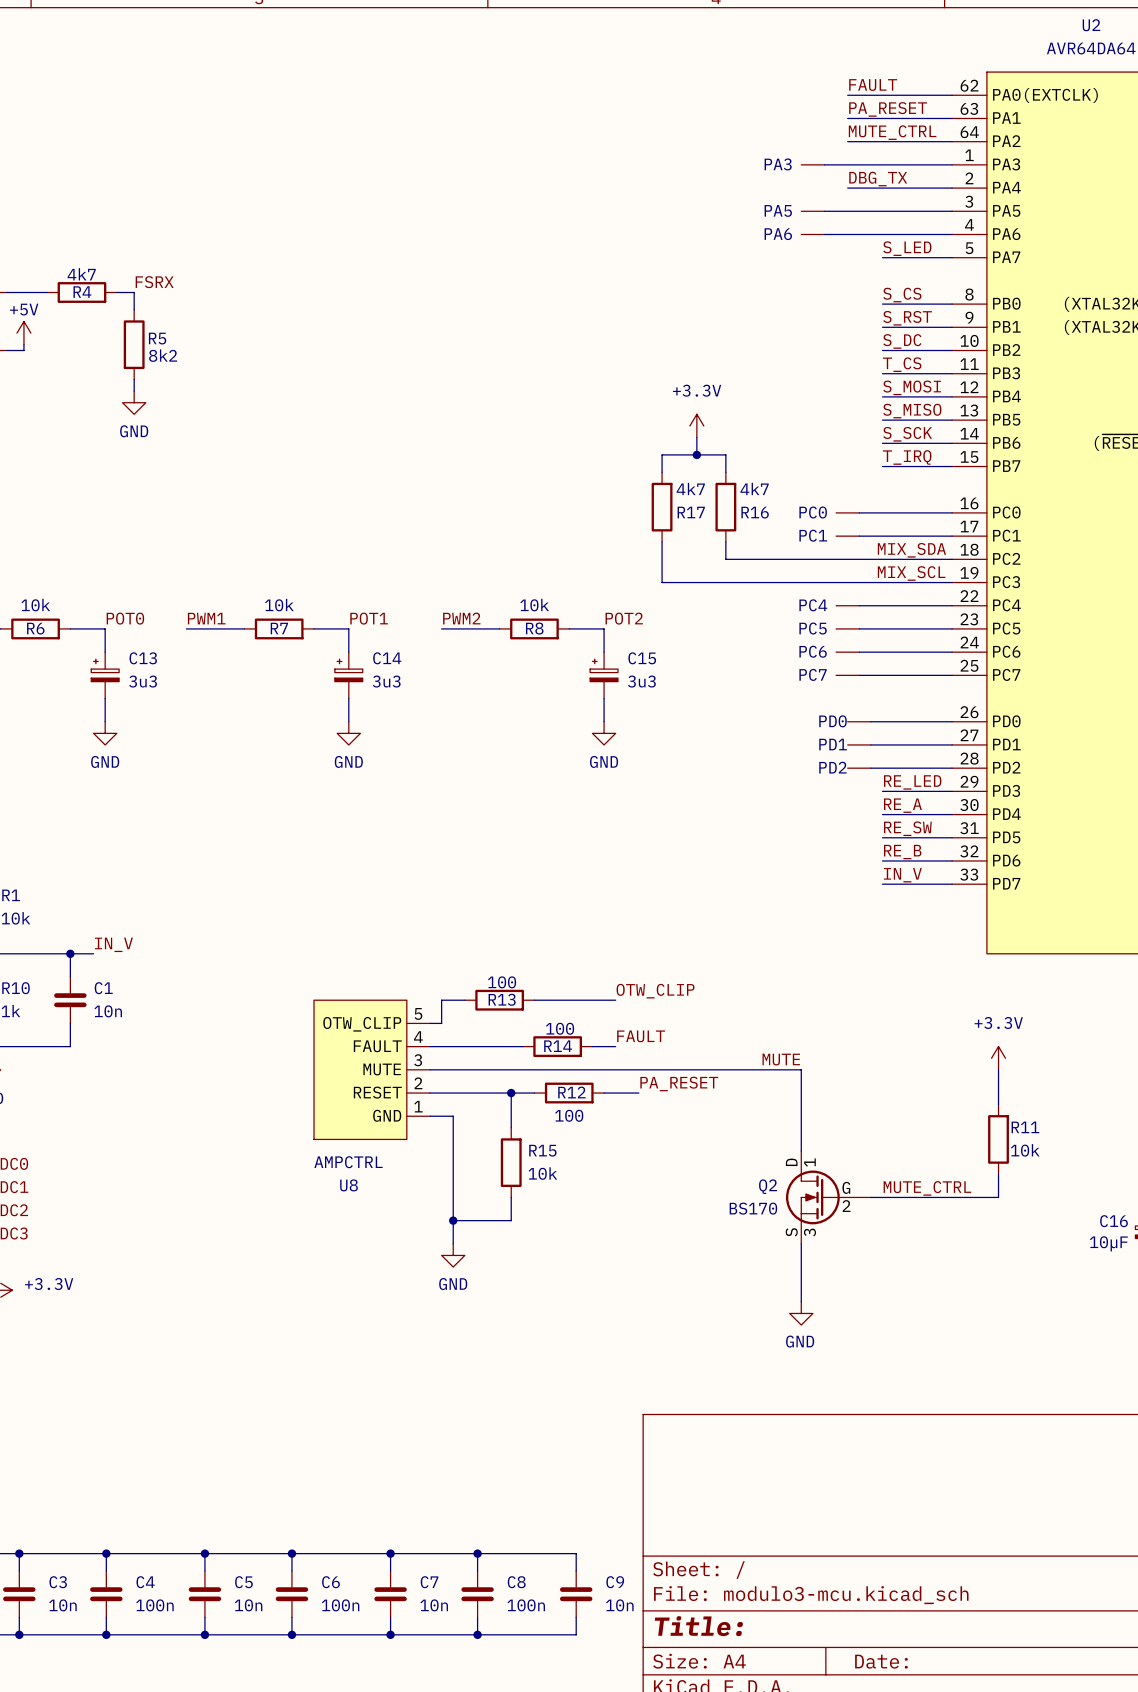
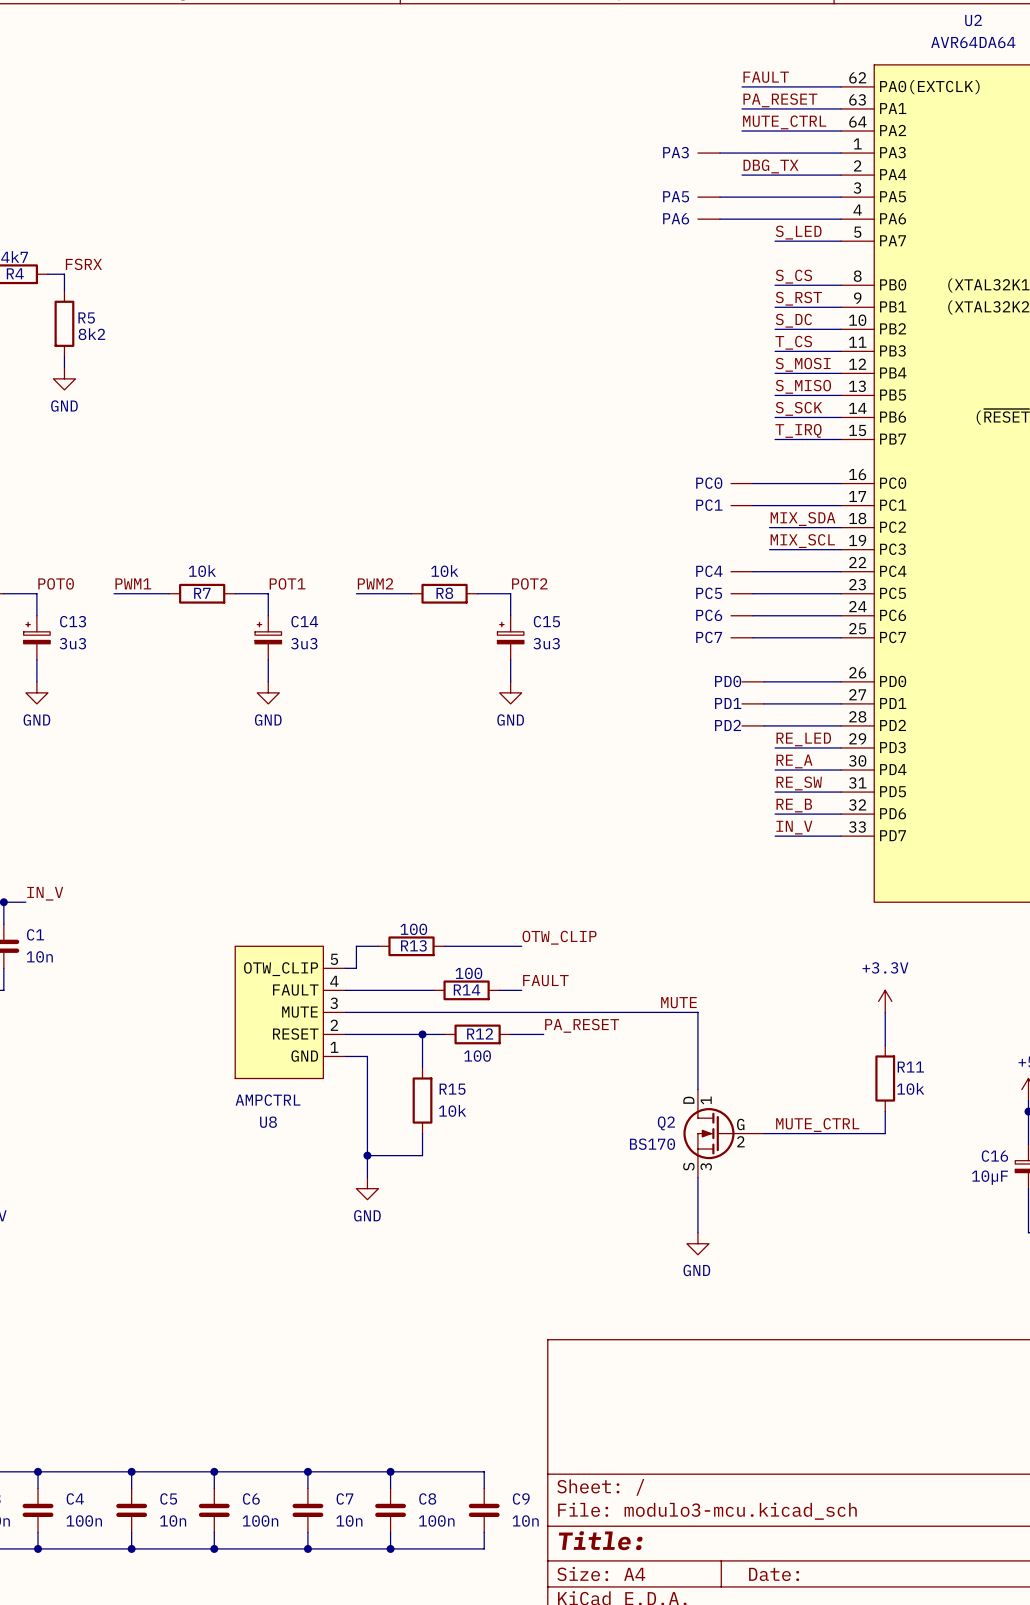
power symbol: +3.3V (696, 425) -> none
wire: (696, 437) (696, 454) -> none
junction: (696, 454) -> none
wire: (662, 472) (662, 454) (725, 454) (725, 472) -> none
R17: 4k7 (662, 507) -> none
R16: 4k7 (725, 507) -> none
wire: (662, 541) (662, 582) (876, 582) -> none
wire: (725, 541) (725, 559) (876, 559) -> none

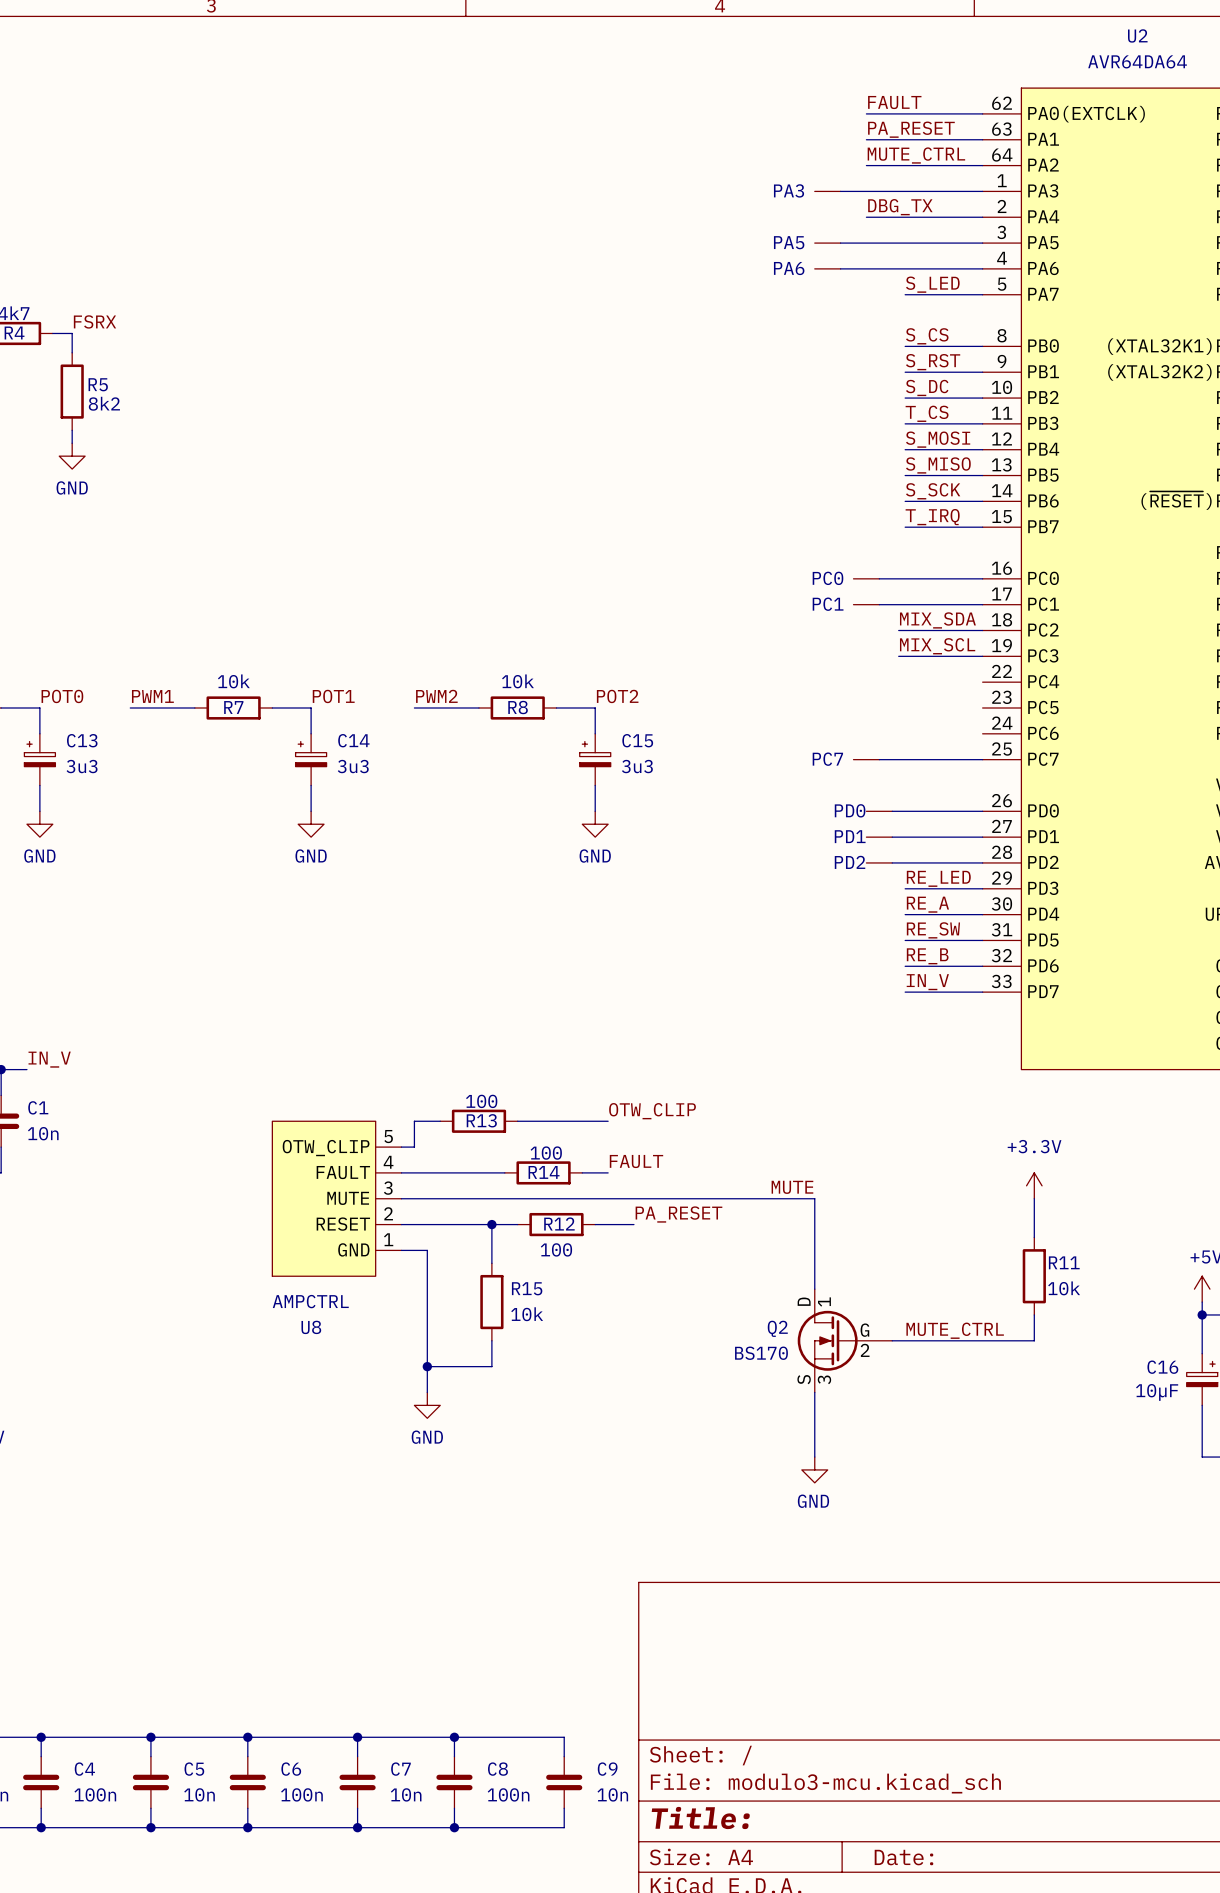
part: PC4 (742, 571) -> none
wire: (753, 571) (841, 571) -> none
part: PC5 (742, 593) -> none
wire: (753, 593) (841, 593) -> none
part: PC6 (742, 615) -> none
wire: (753, 615) (841, 615) -> none

